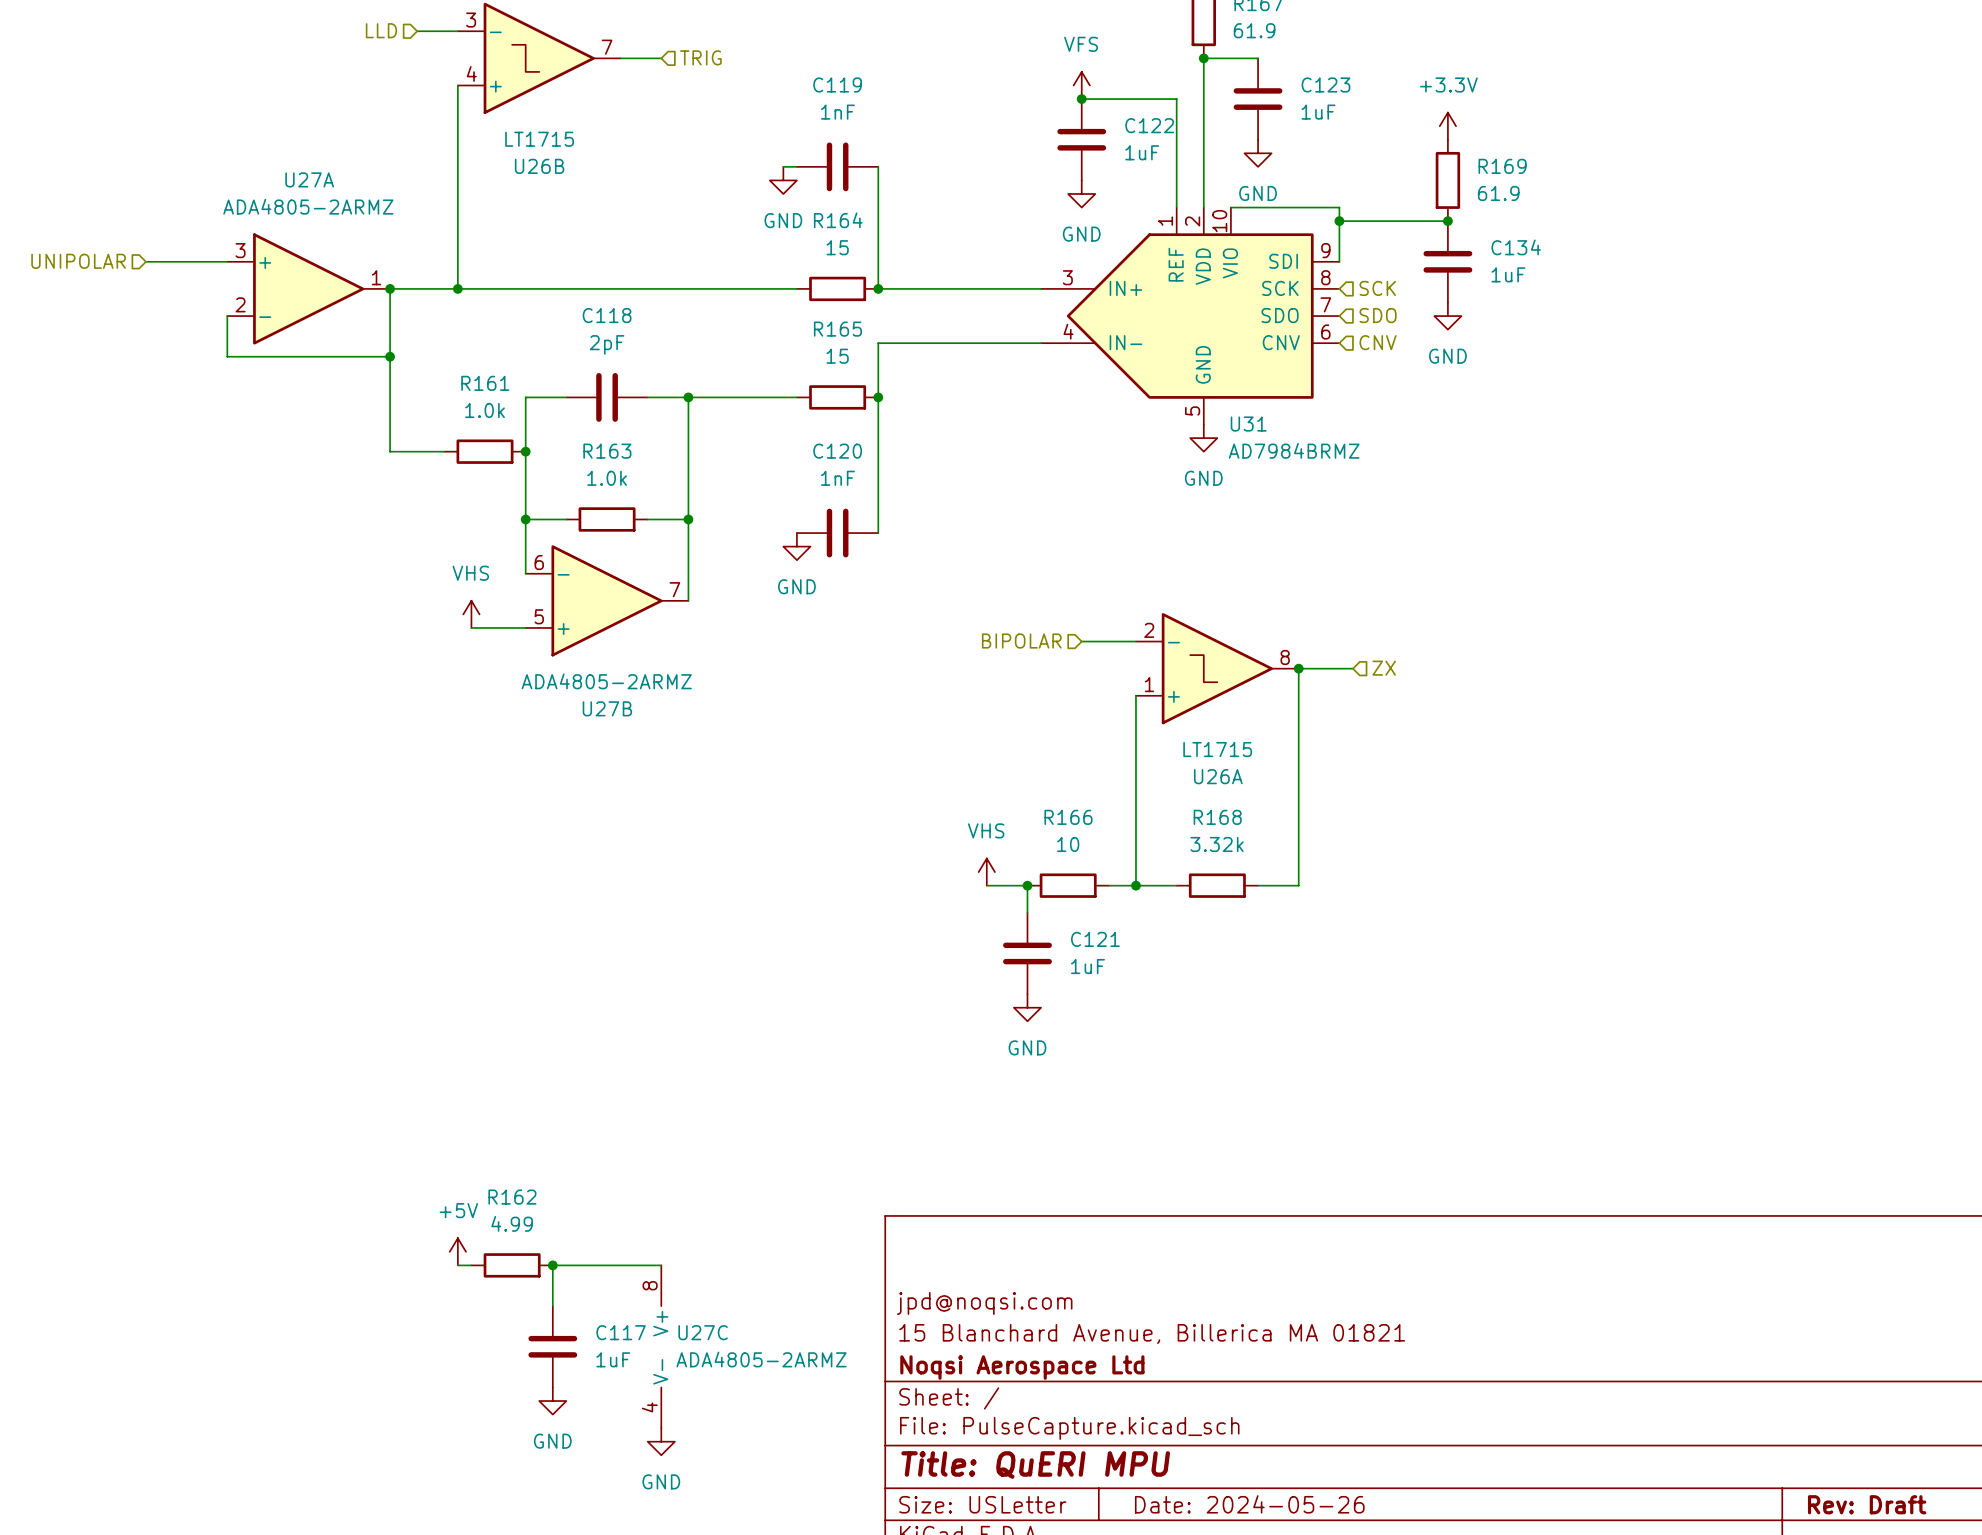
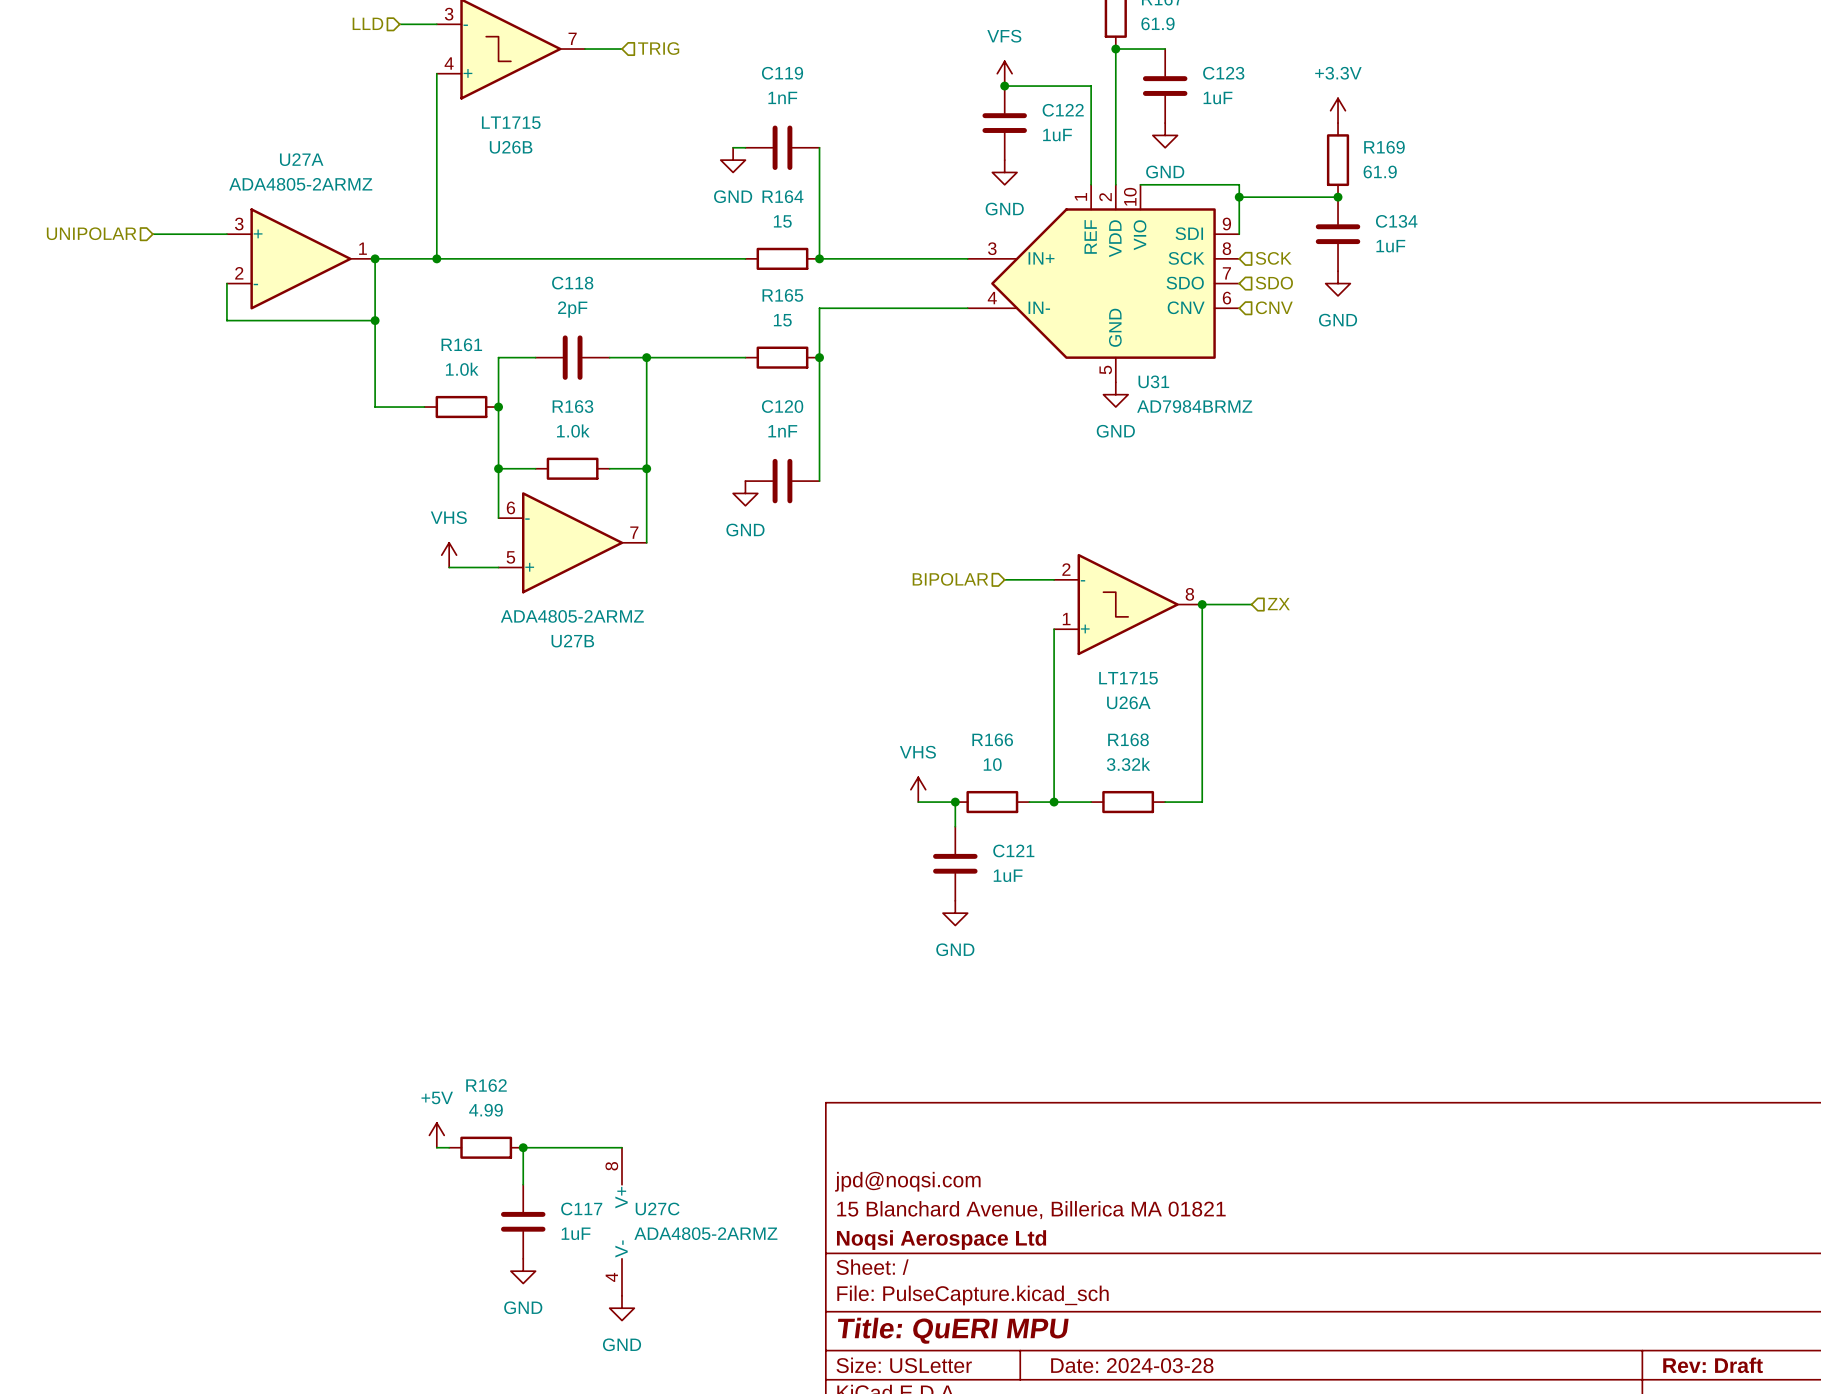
title block: Date: 2024-05-26 (1249, 1504) -> Date: 2024-03-28 (1132, 1365)

